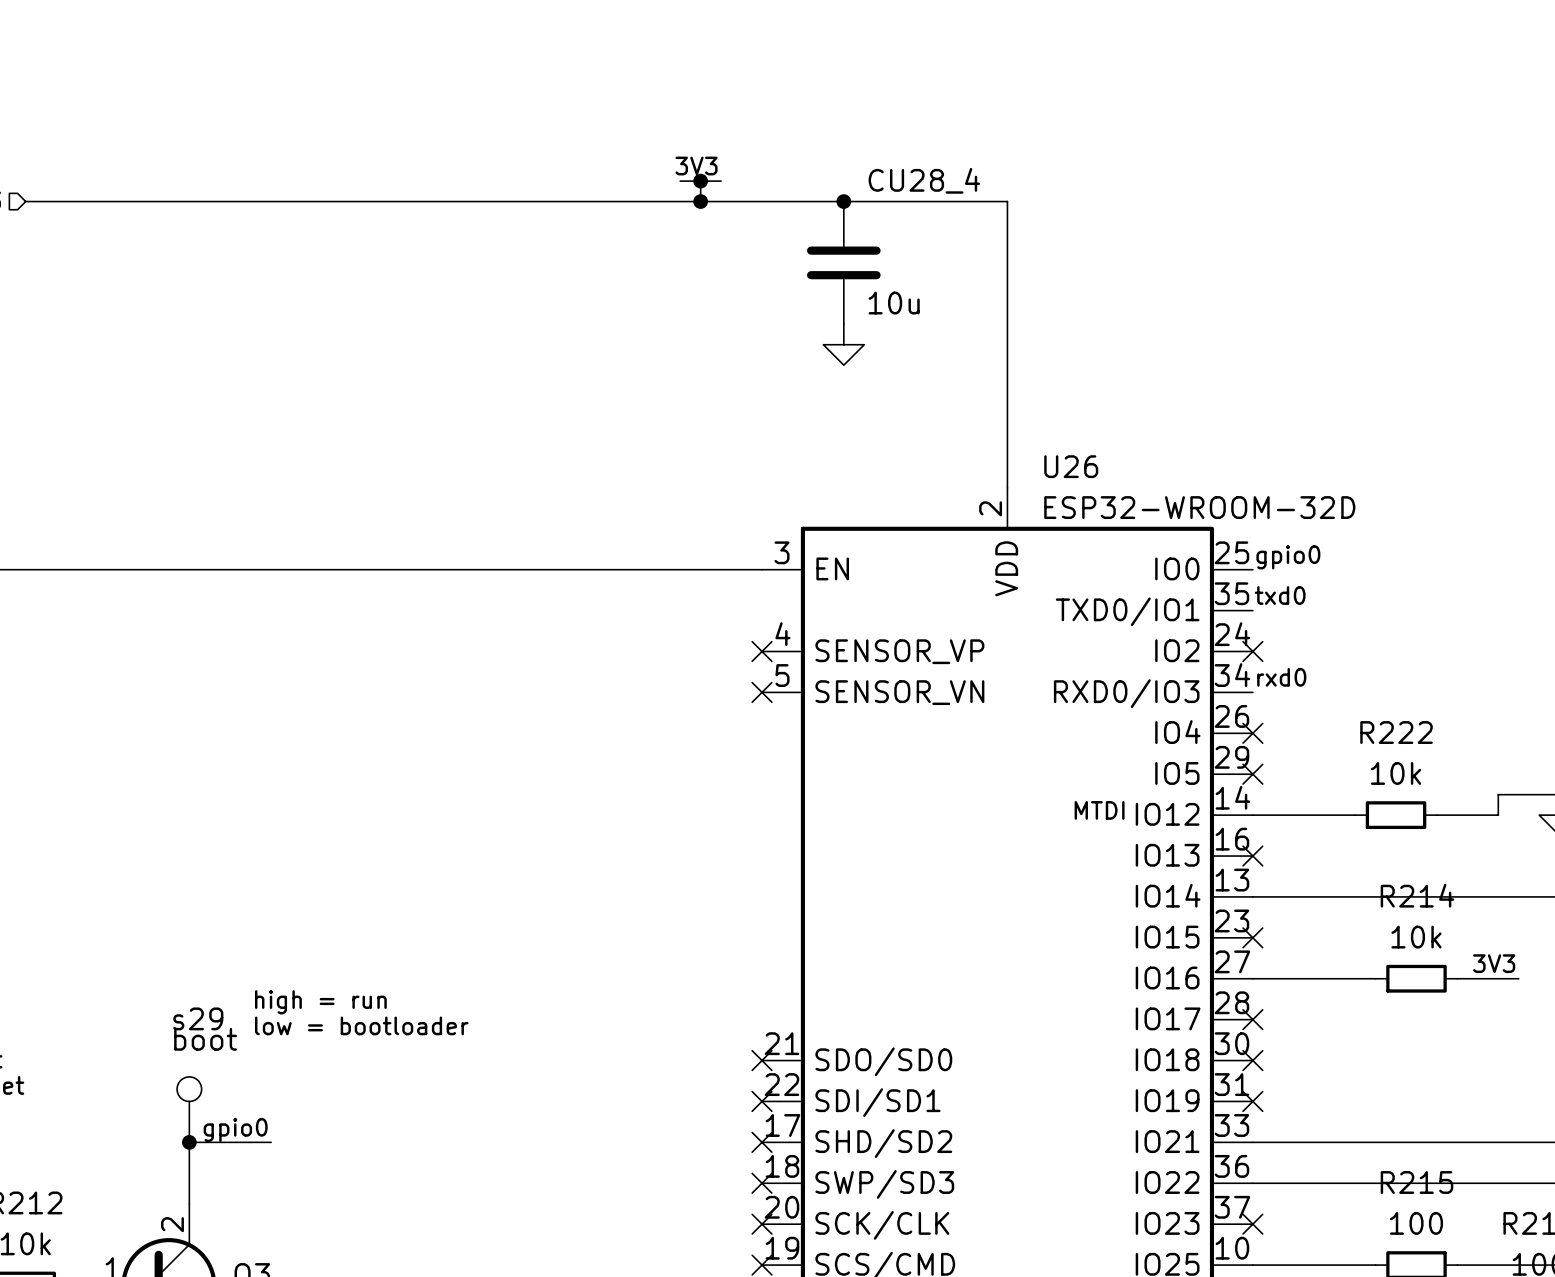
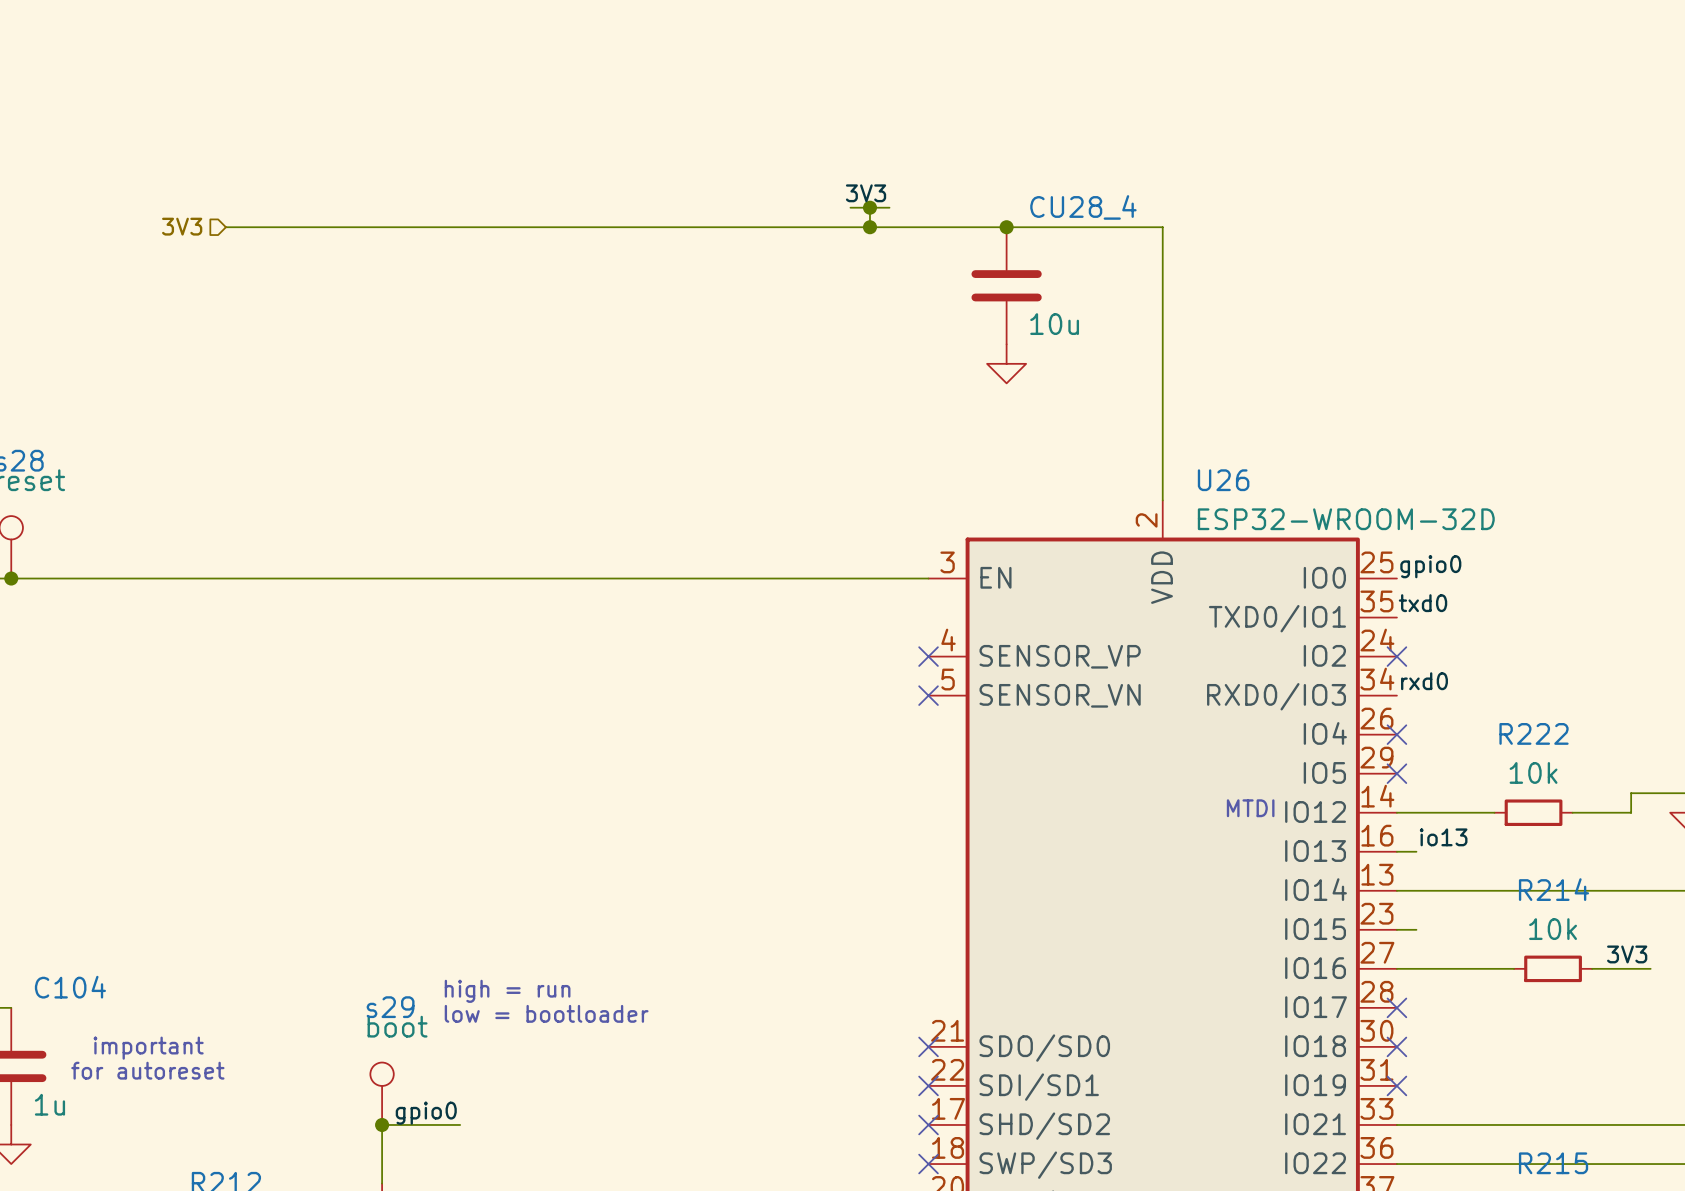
label: none -> io13 (1443, 837)
wire: none -> (1396, 851) (1416, 851)
no-connect mark: (1252, 856) -> none
wire: none -> (1396, 929) (1416, 929)
no-connect mark: (1252, 937) -> none

